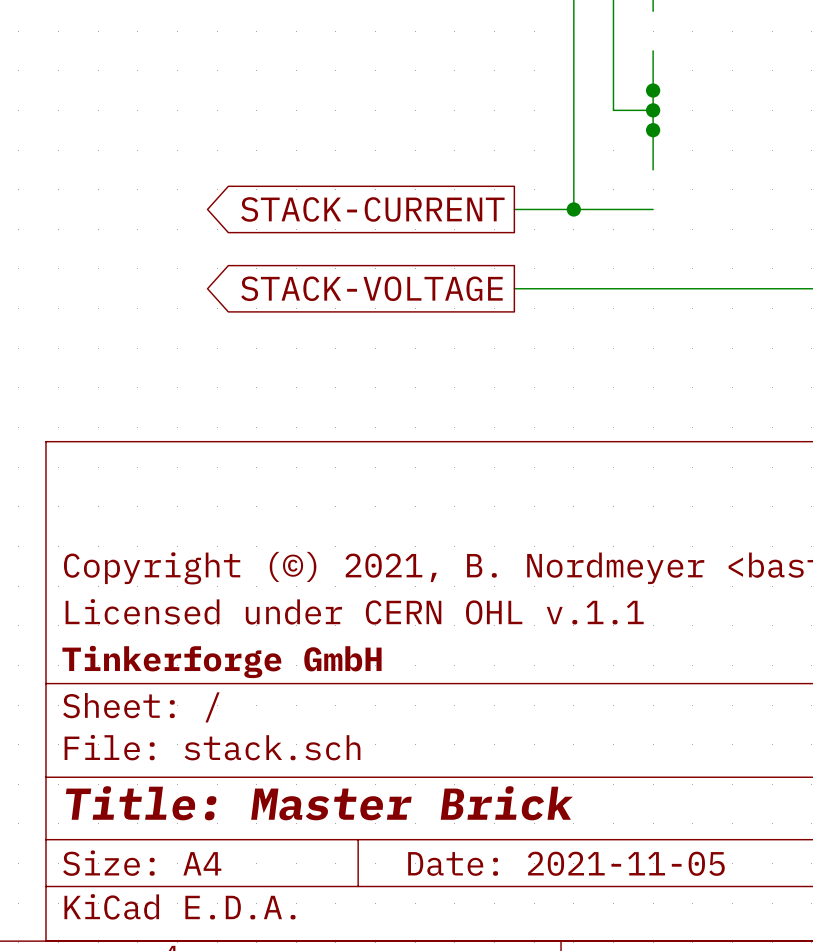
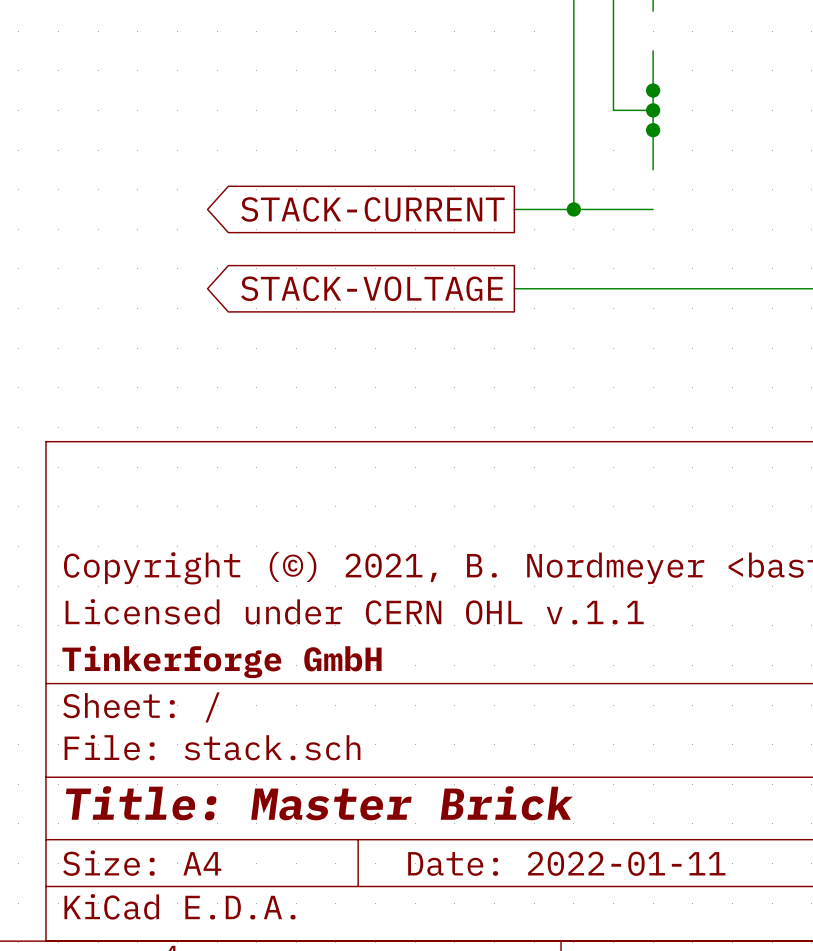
title block: Date: 2021-11-05 (566, 863) -> Date: 2022-01-11 (566, 863)

